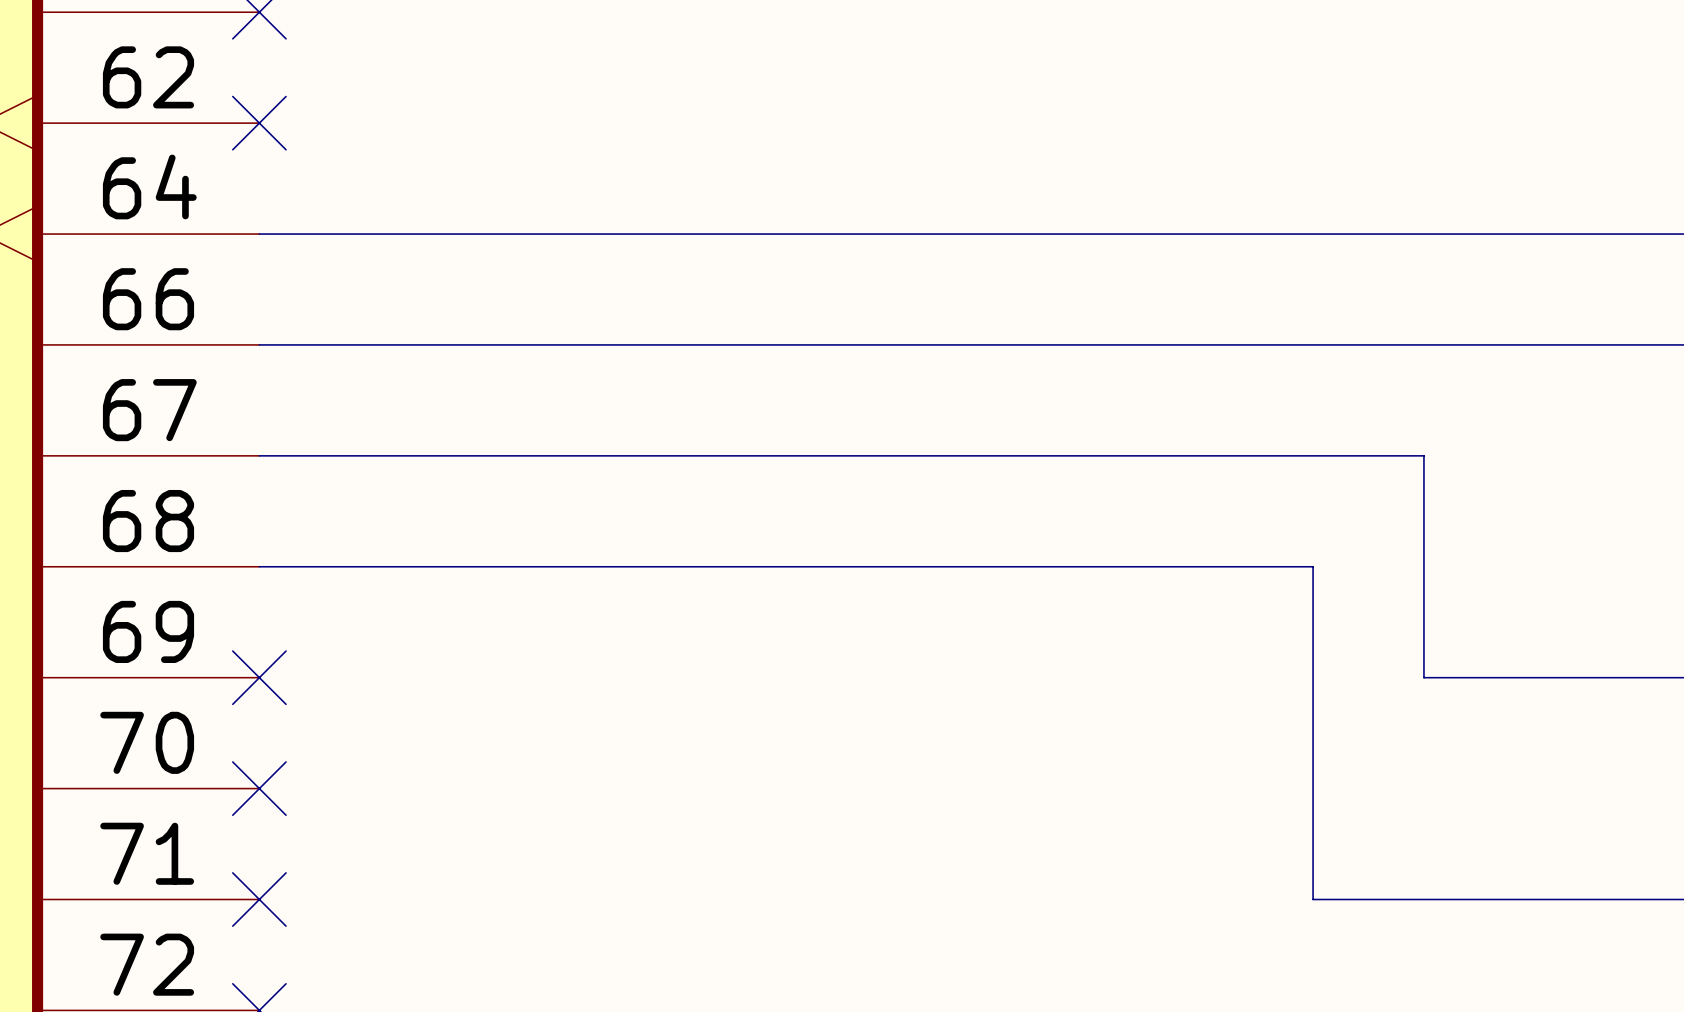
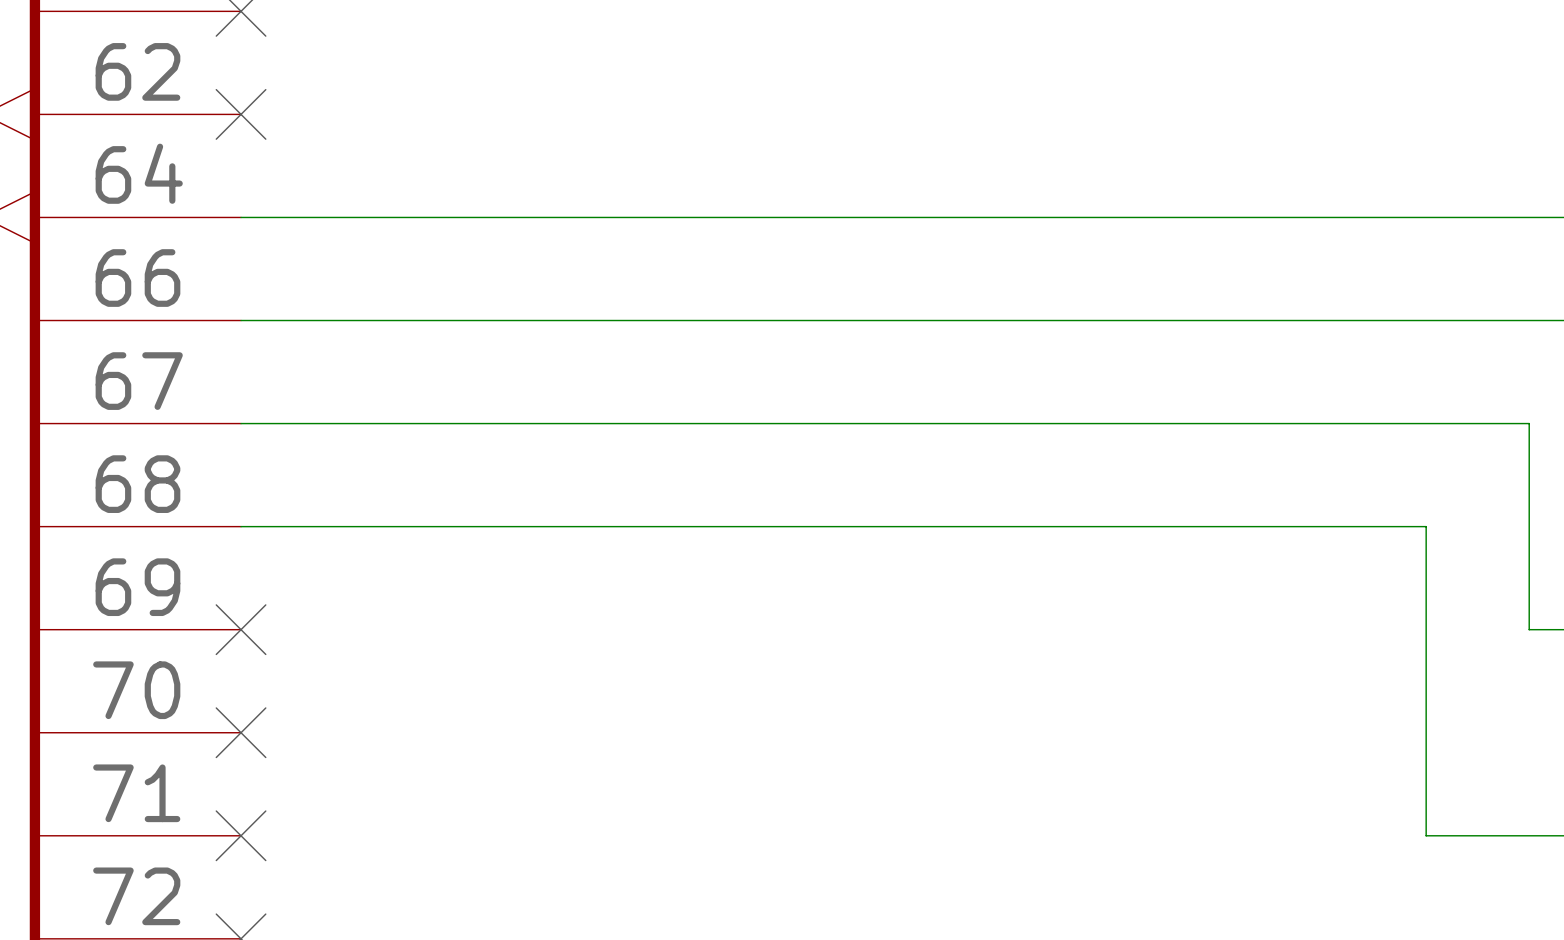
wire: (1423, 455) (1423, 677) (1645, 677) -> (1323, 423) (1529, 423) (1529, 629)
wire: (1313, 566) (1313, 899) (1534, 899) -> (1220, 526) (1426, 526) (1426, 835)

